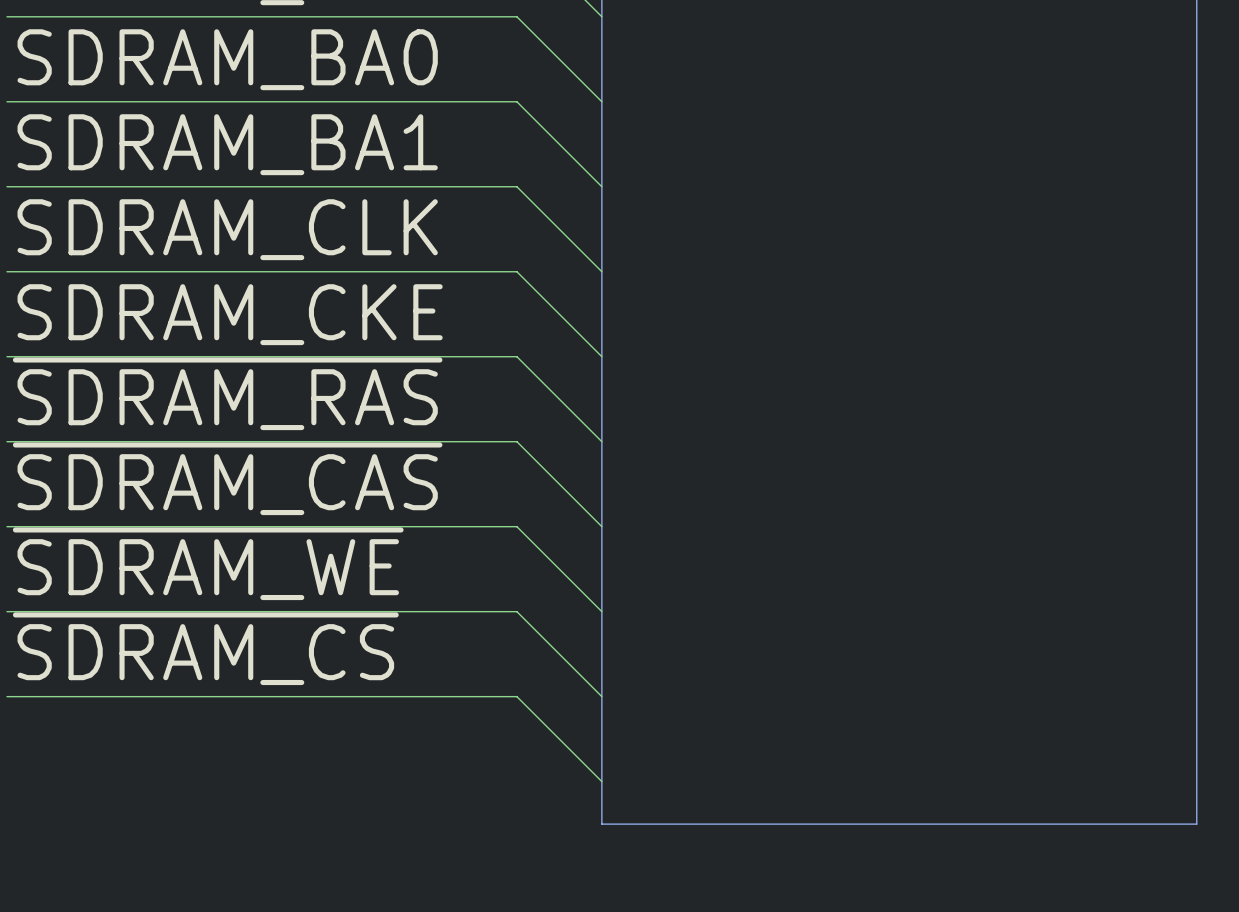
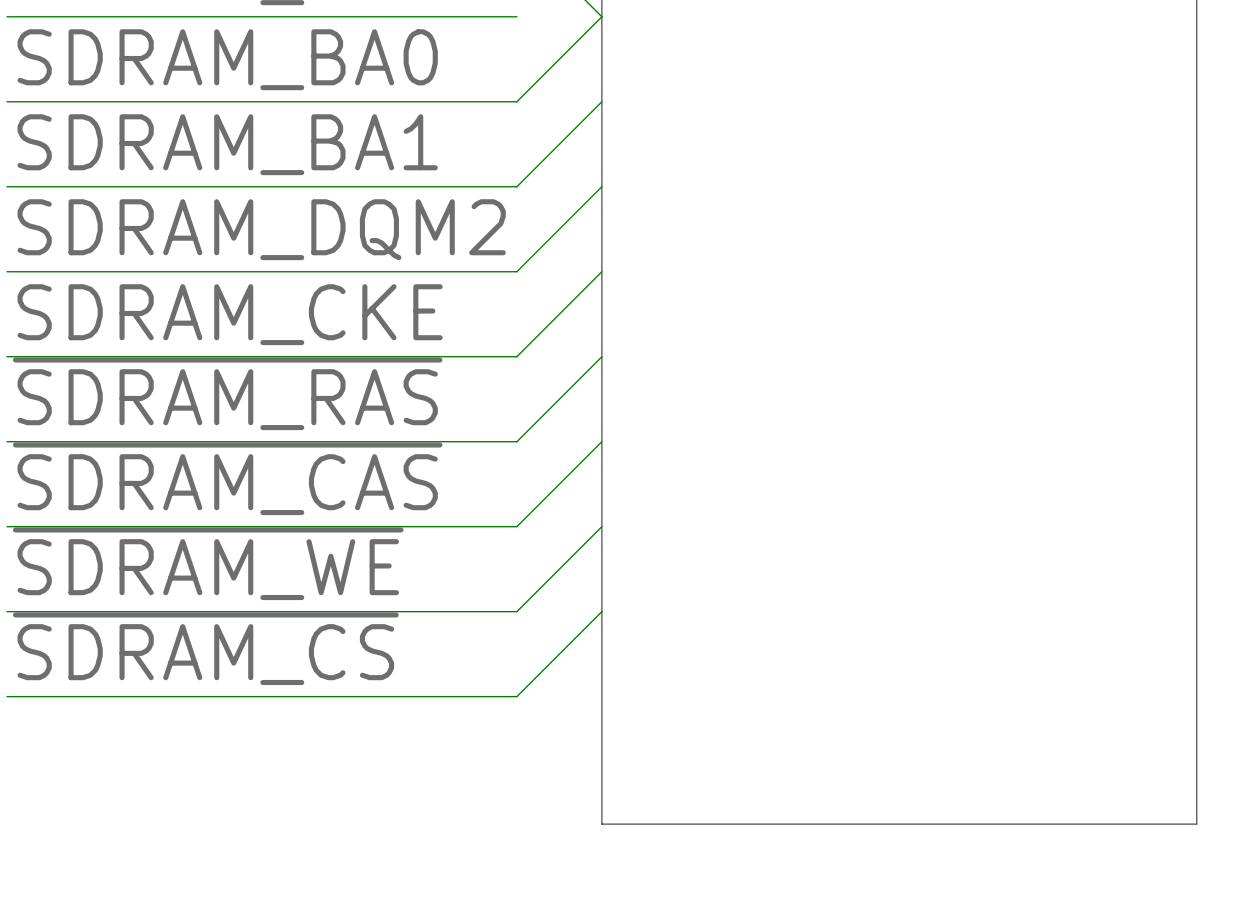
wire: (516, 16) (601, 101) -> (516, 186) (601, 101)
wire: (516, 101) (601, 186) -> (516, 101) (601, 16)
wire: (516, 186) (601, 271) -> (516, 356) (601, 271)
label: SDRAM_CLK (227, 229) -> SDRAM_DQM2 (261, 229)
wire: (516, 271) (601, 356) -> (516, 271) (601, 186)
wire: (516, 356) (601, 441) -> (516, 526) (601, 441)
wire: (516, 441) (601, 526) -> (516, 441) (601, 356)
wire: (516, 526) (601, 611) -> (516, 696) (601, 611)
wire: (516, 611) (601, 696) -> (516, 611) (601, 526)
wire: (516, 696) (601, 781) -> none

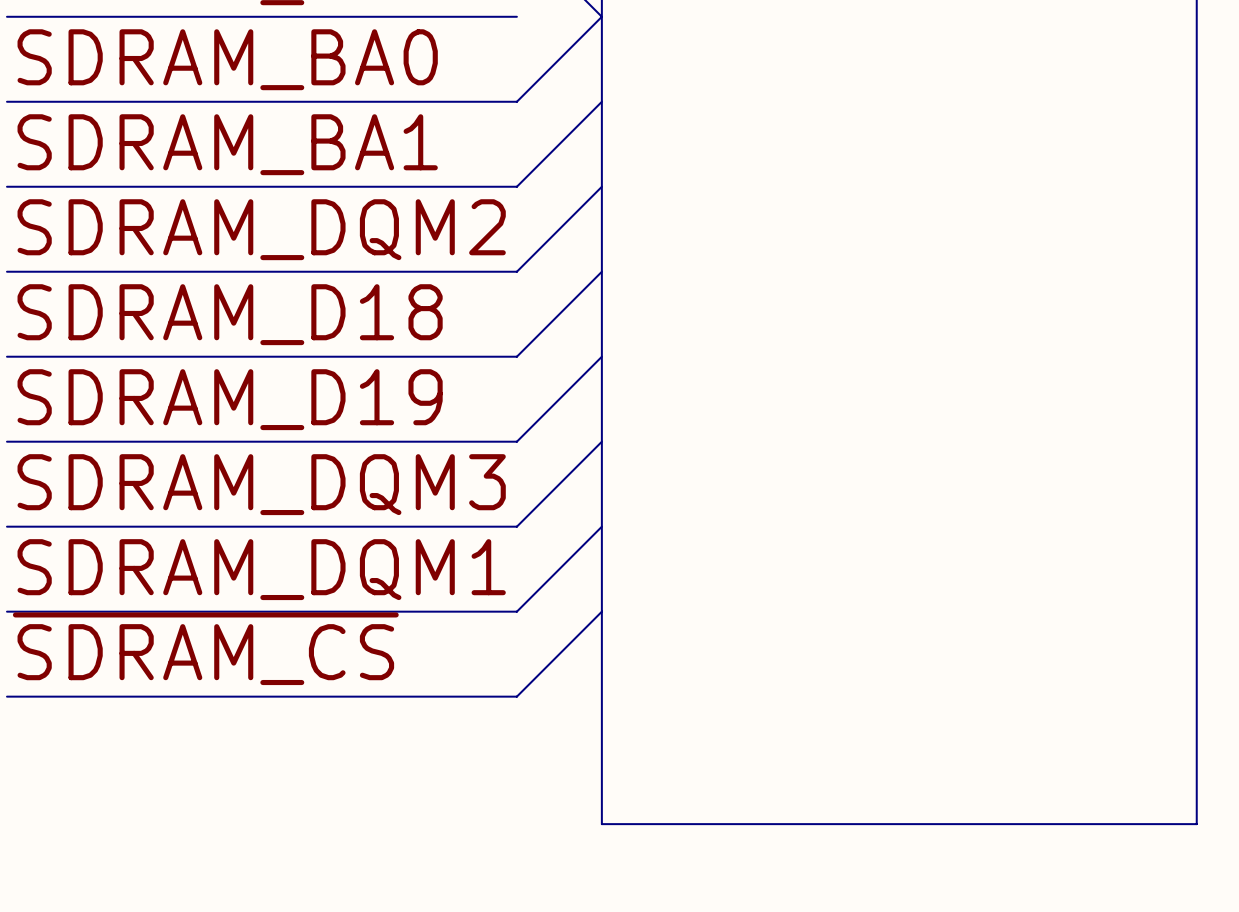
label: SDRAM_CKE (230, 314) -> SDRAM_D18 (230, 314)
label: ~{SDRAM_RAS} (227, 393) -> SDRAM_D19 (230, 399)
label: ~{SDRAM_CAS} (227, 478) -> SDRAM_DQM3 (261, 484)
label: ~{SDRAM_WE} (208, 563) -> SDRAM_DQM1 (261, 569)

